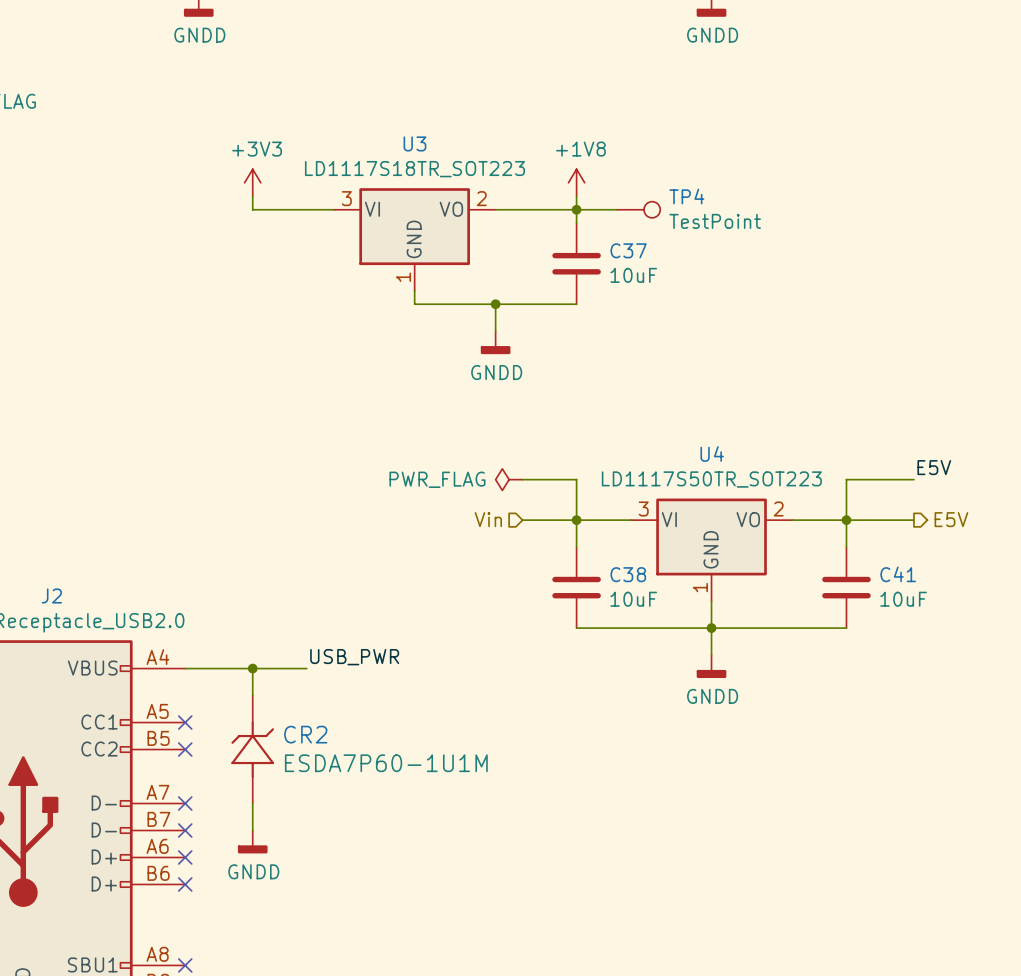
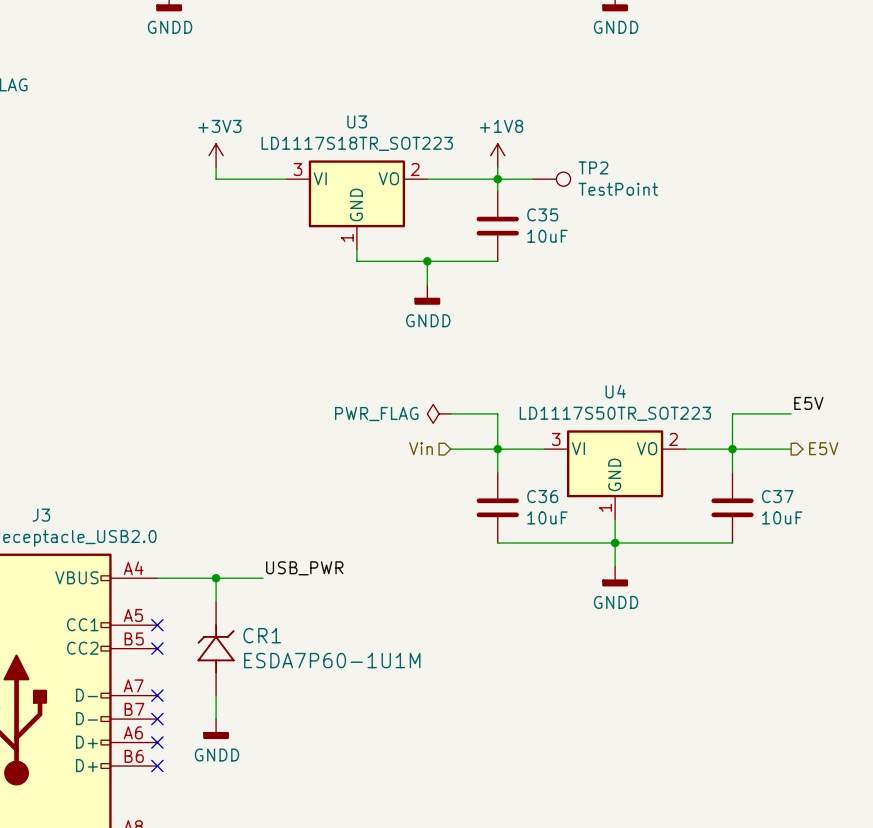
TP4 name: TP4 (686, 196) -> TP2 (593, 167)
C37 name: C37 (628, 250) -> C35 (542, 214)
C38 name: C38 (628, 574) -> C36 (542, 496)
C41 name: C41 (898, 574) -> C37 (777, 496)
J2 name: J2 (51, 596) -> J3 (41, 515)
CR2 name: CR2 (305, 734) -> CR1 (262, 635)

